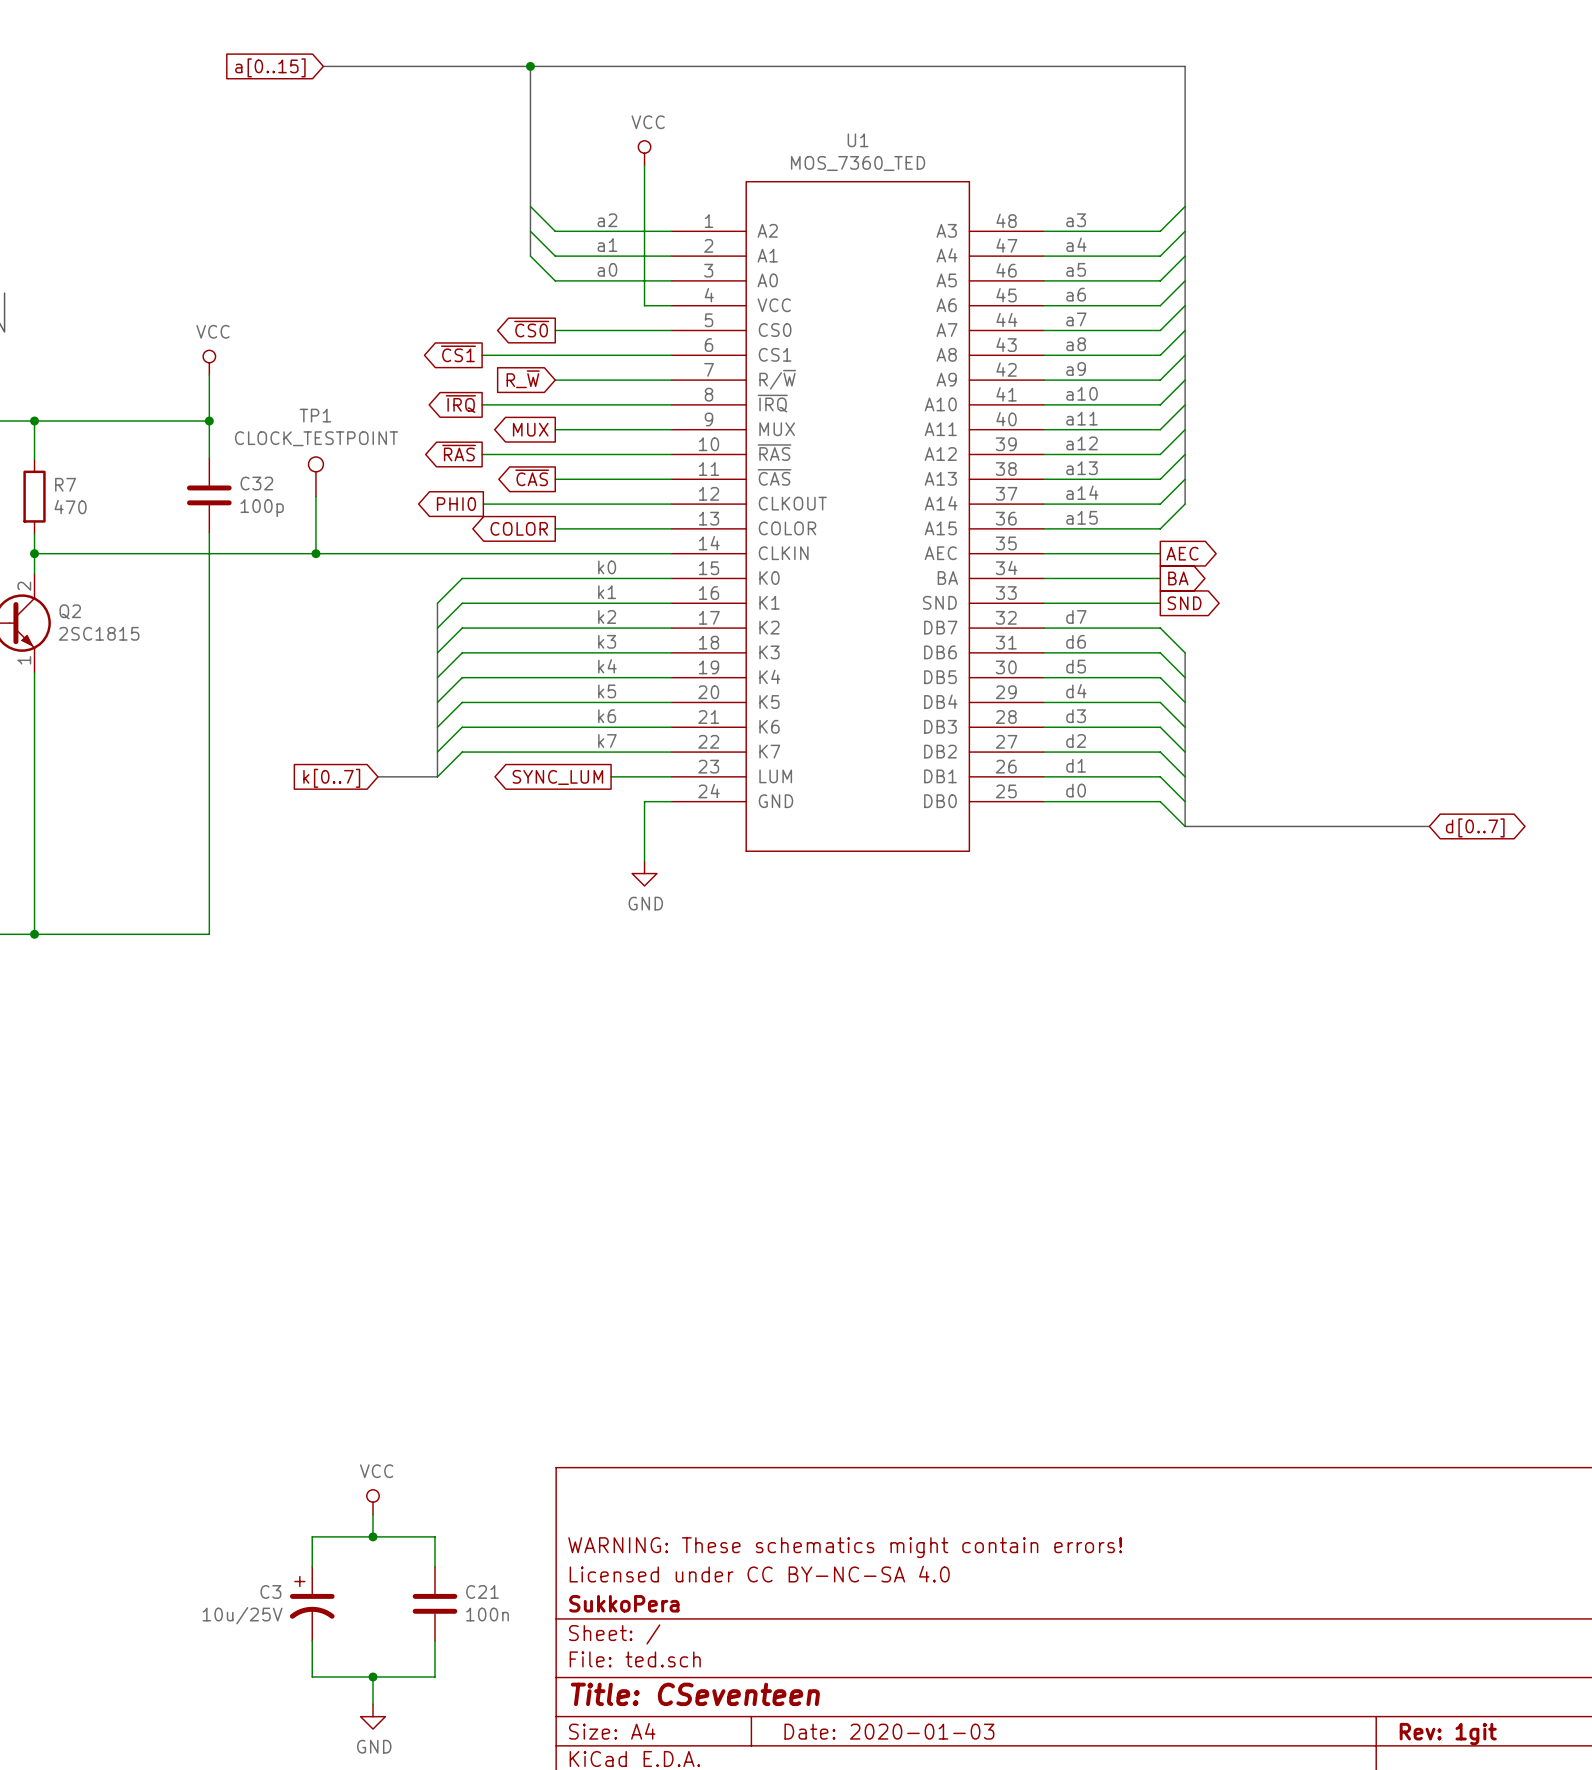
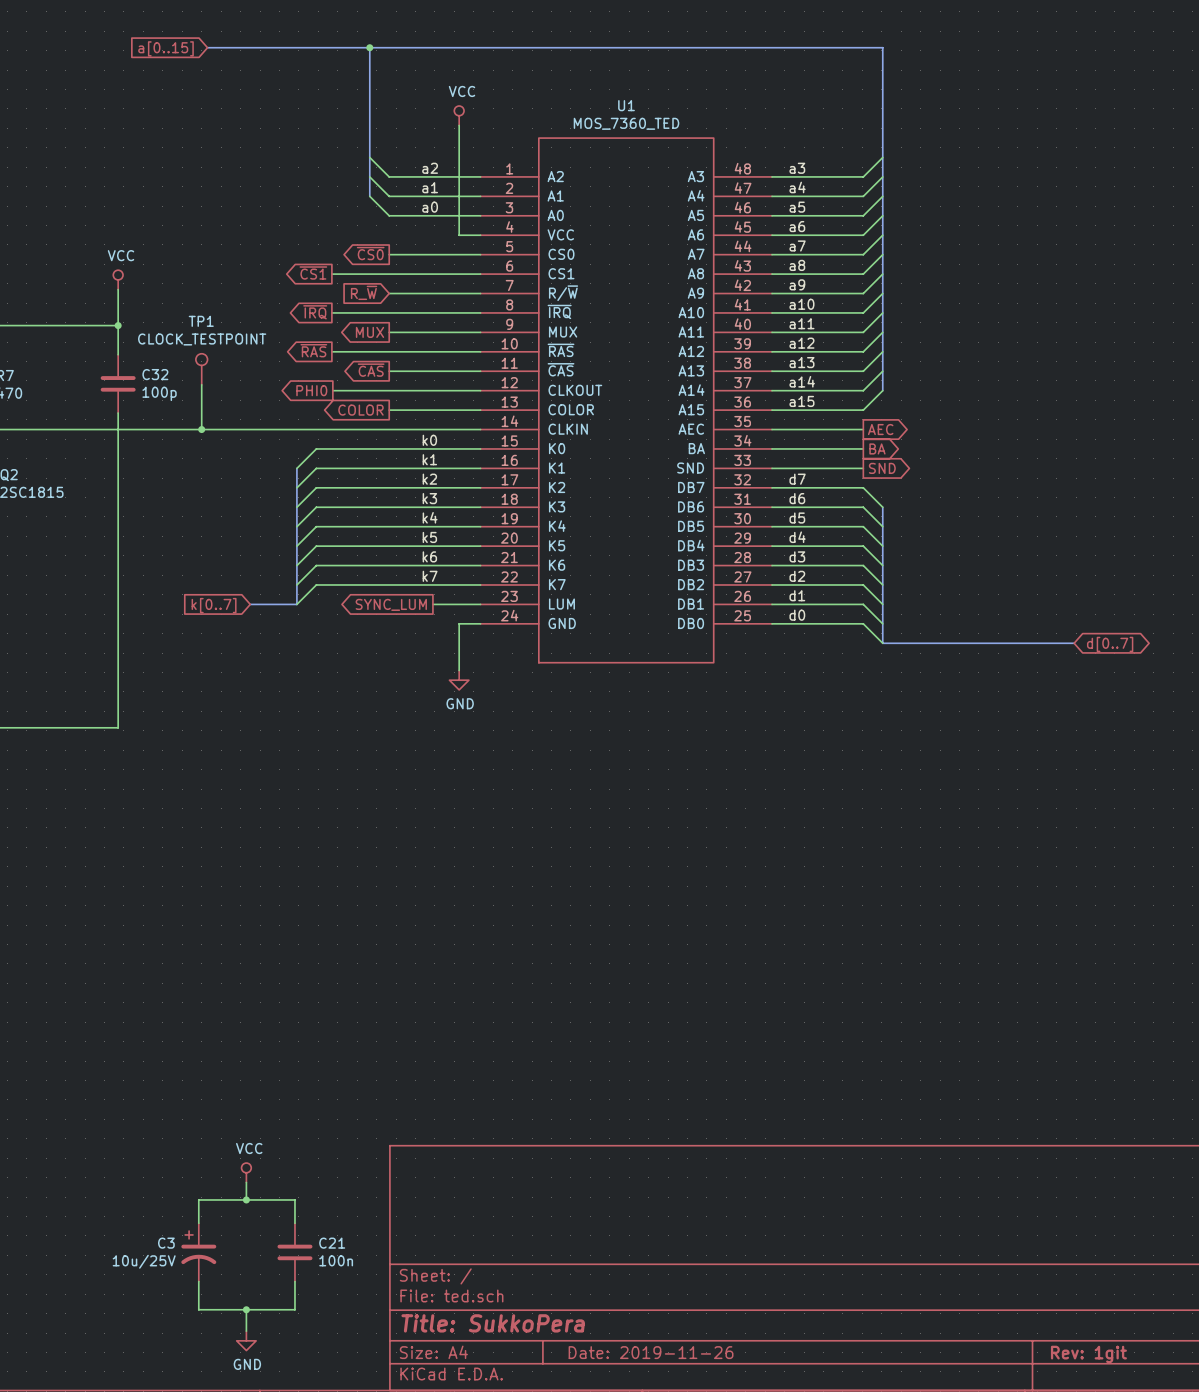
title block: WARNING: These schematics might contain errors! (845, 1547) -> none
title block: Licensed under CC BY-NC-SA 4.0 (759, 1574) -> none
title block: SukkoPera (624, 1603) -> none
title block: Title: CSeventeen (695, 1694) -> Title: SukkoPera (493, 1323)
title block: Date: 2020-01-03 (889, 1731) -> Date: 2019-11-26 (651, 1352)

